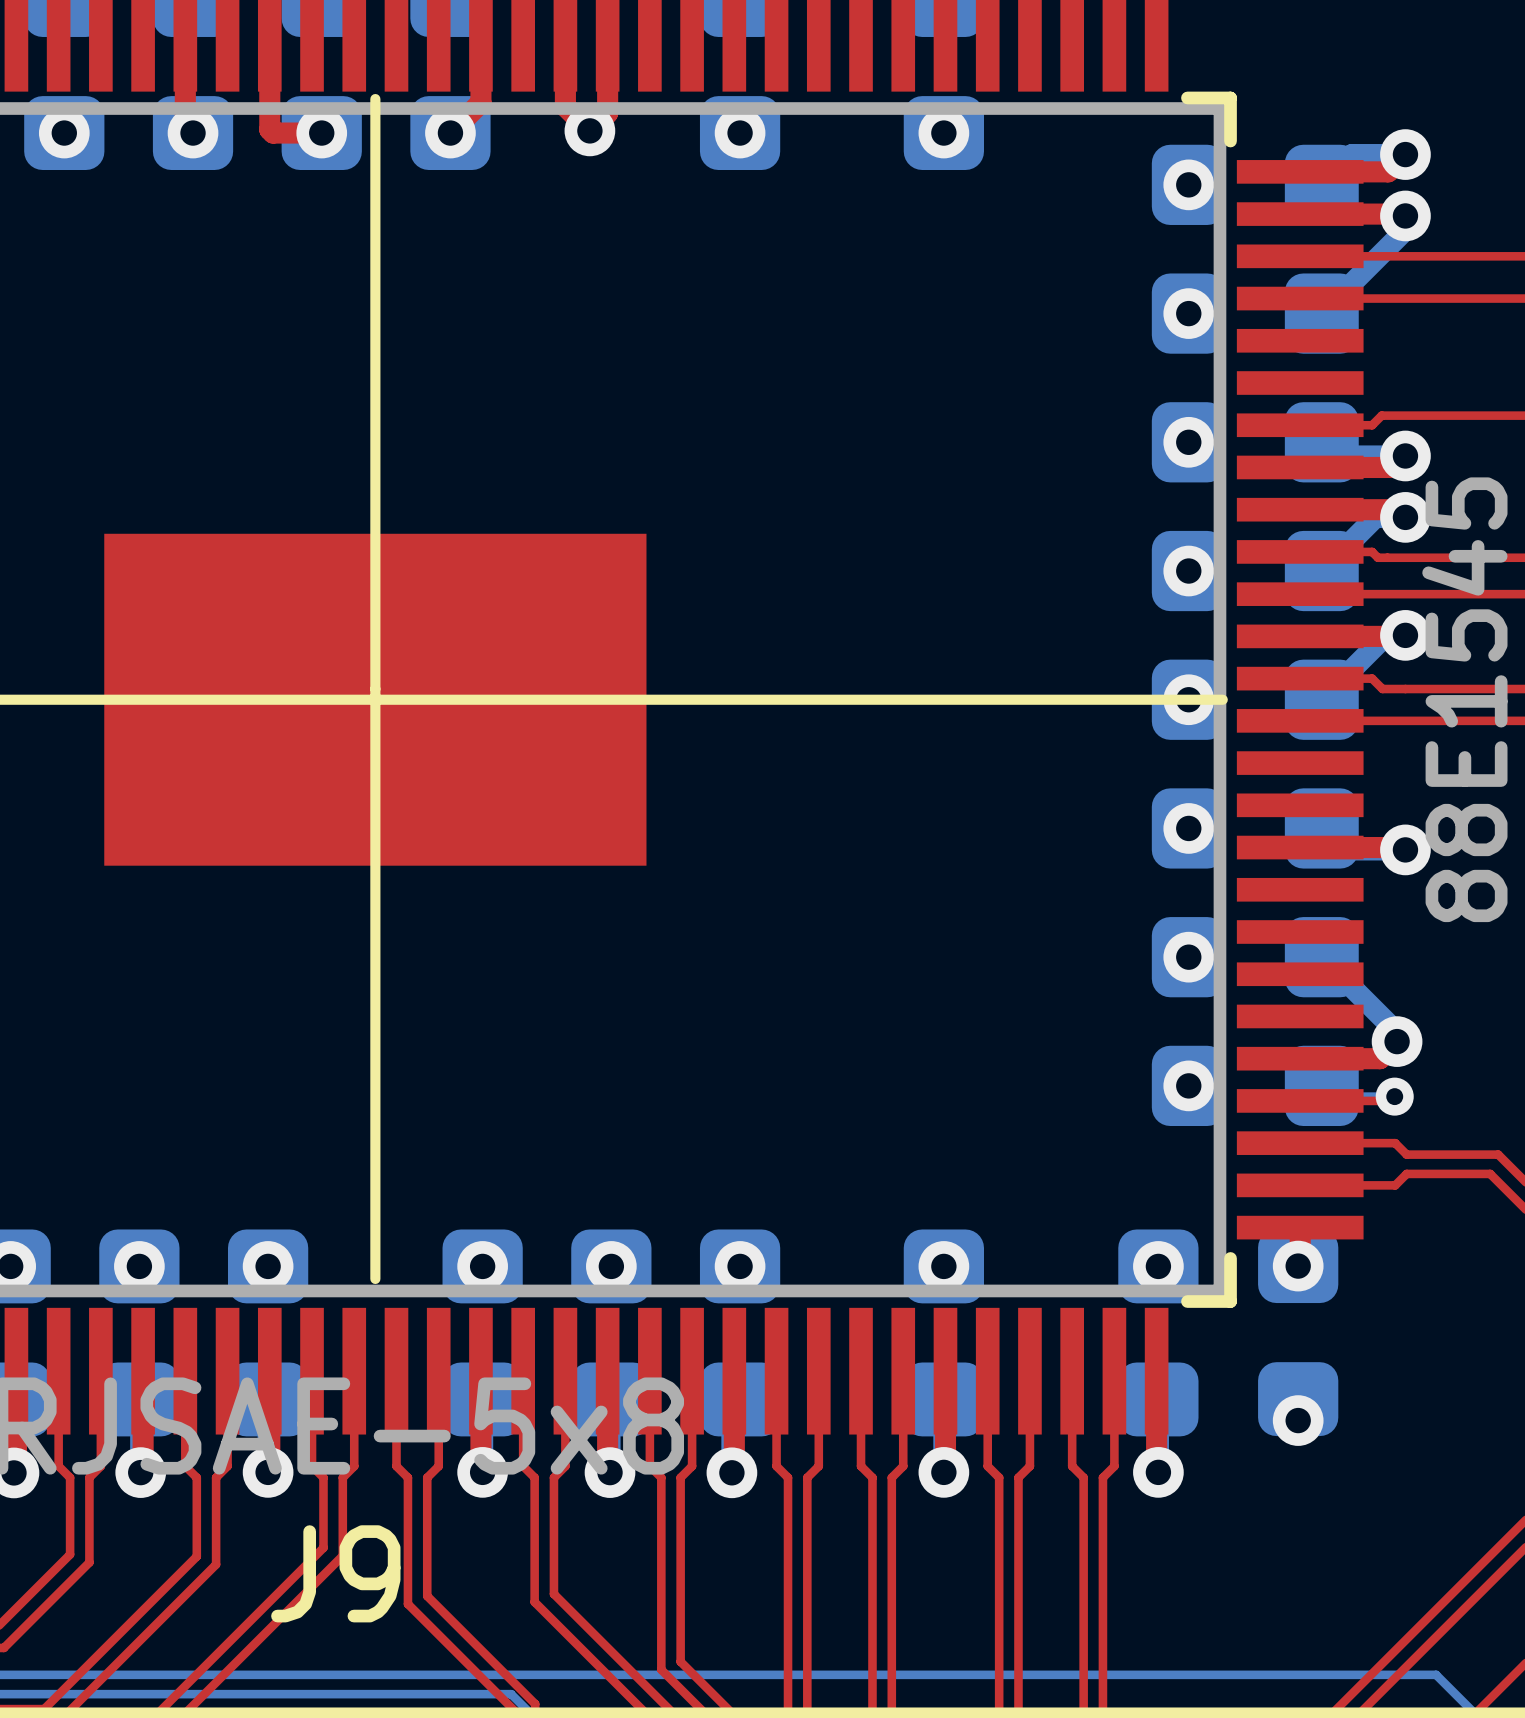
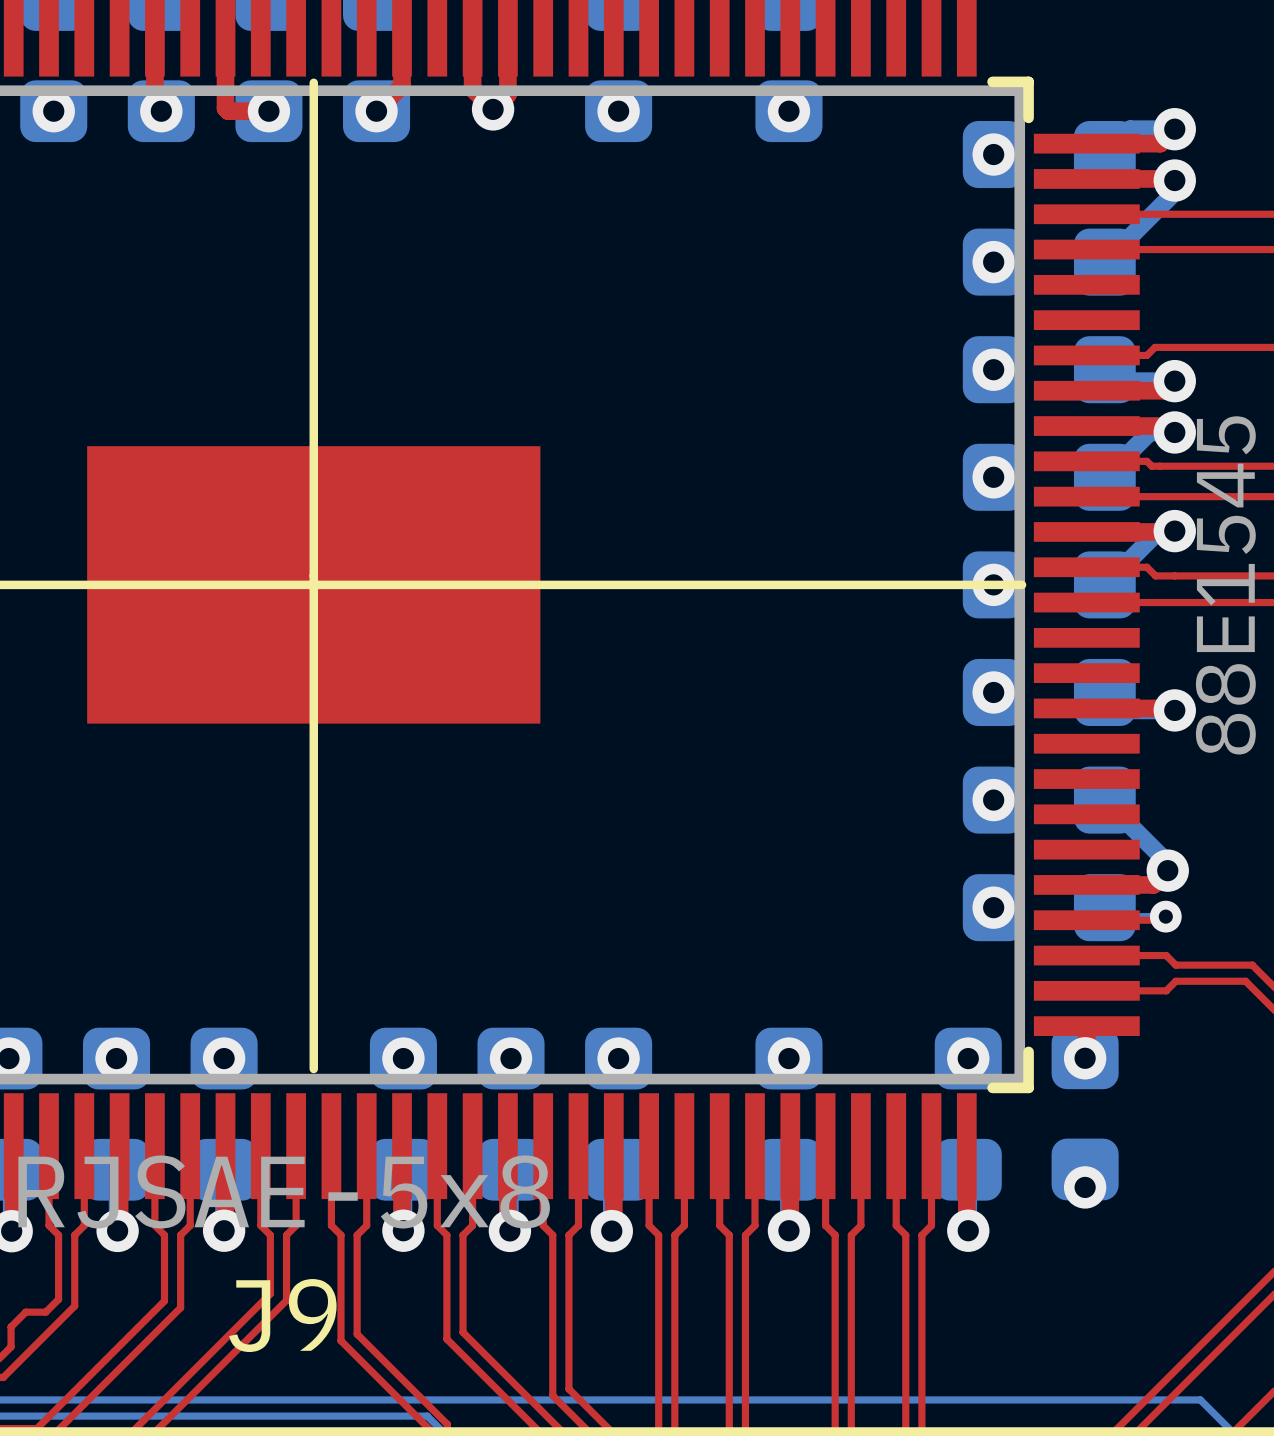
top track: (54, 1569) (13, 1611) -> (45, 1312) (25, 1312) (11, 1326) (11, 1346)

